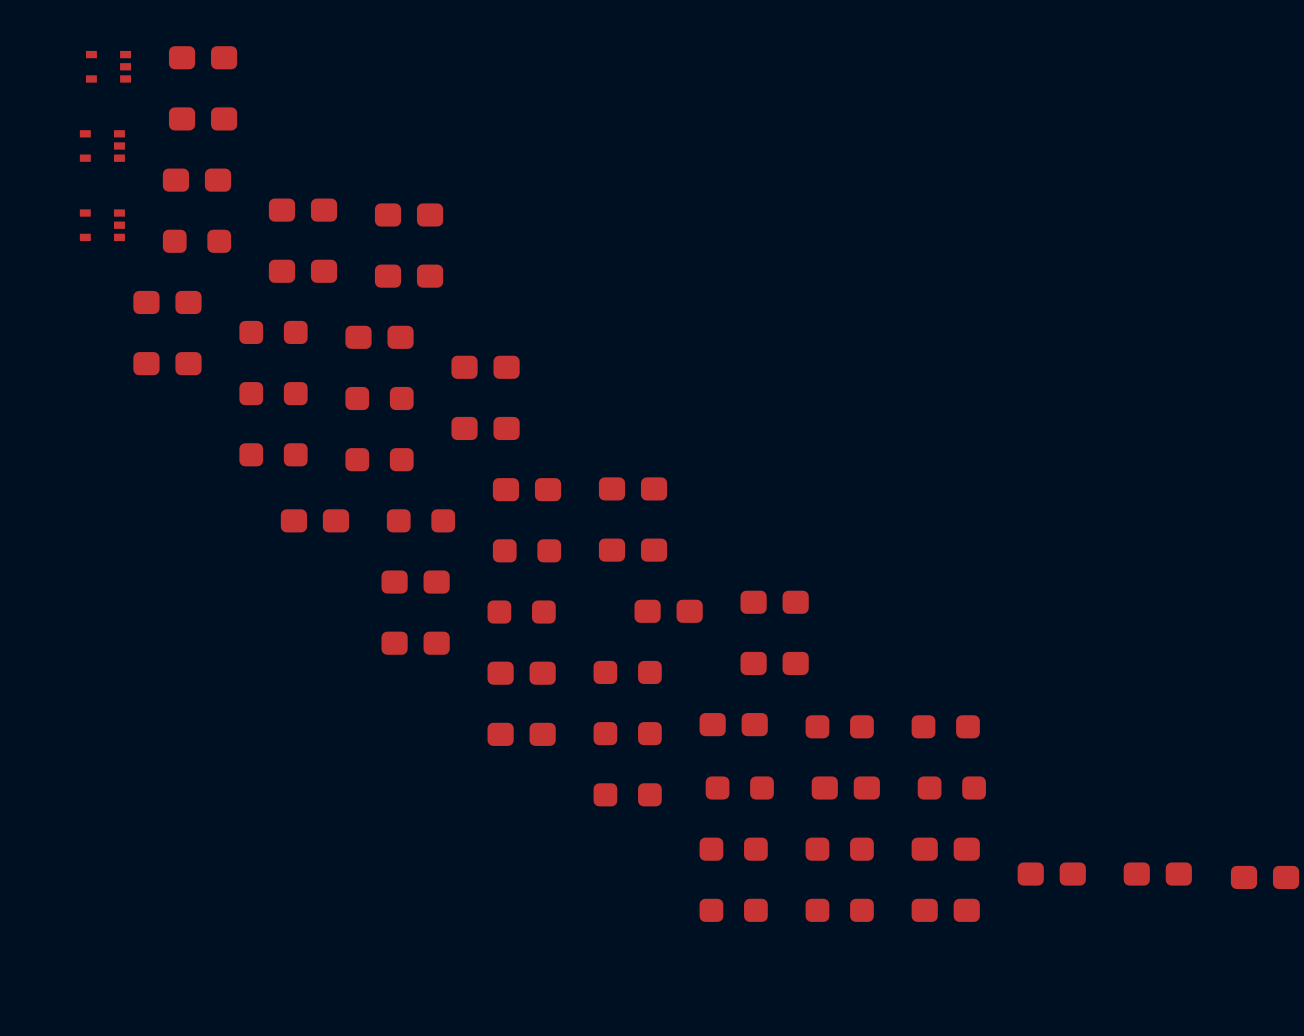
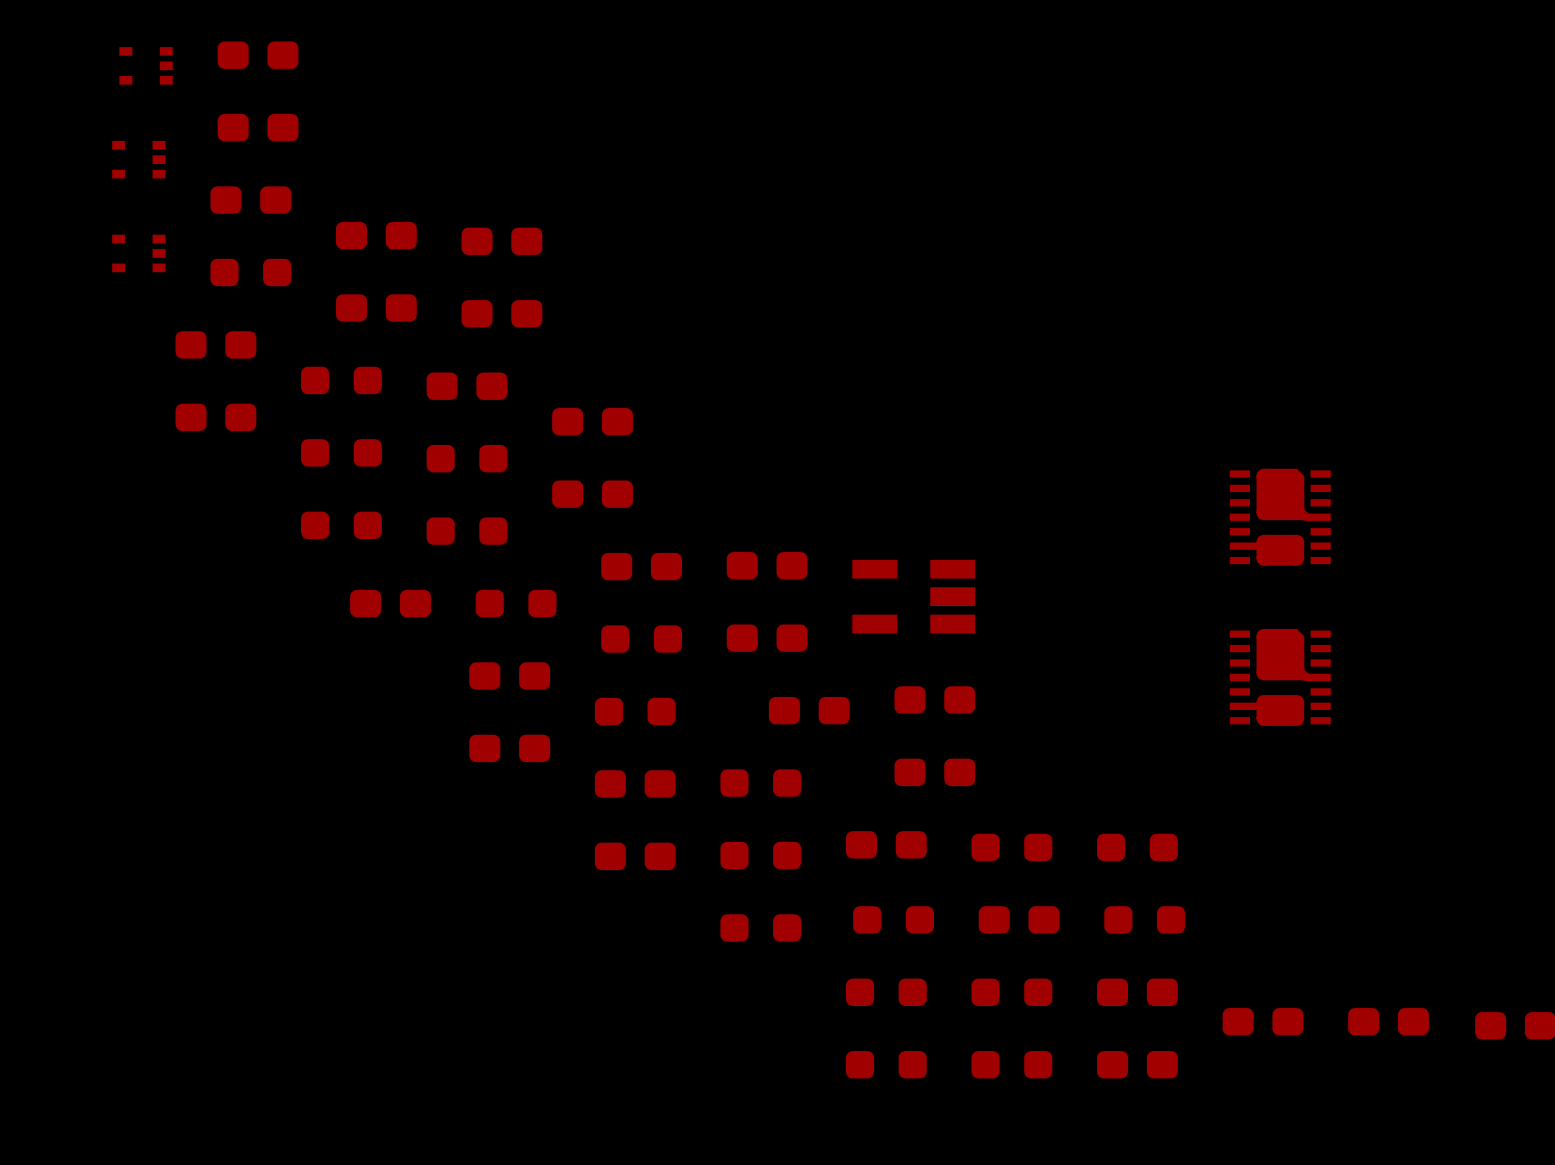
part: none -> (1280, 517)
part: none -> (913, 596)
part: none -> (1280, 677)

